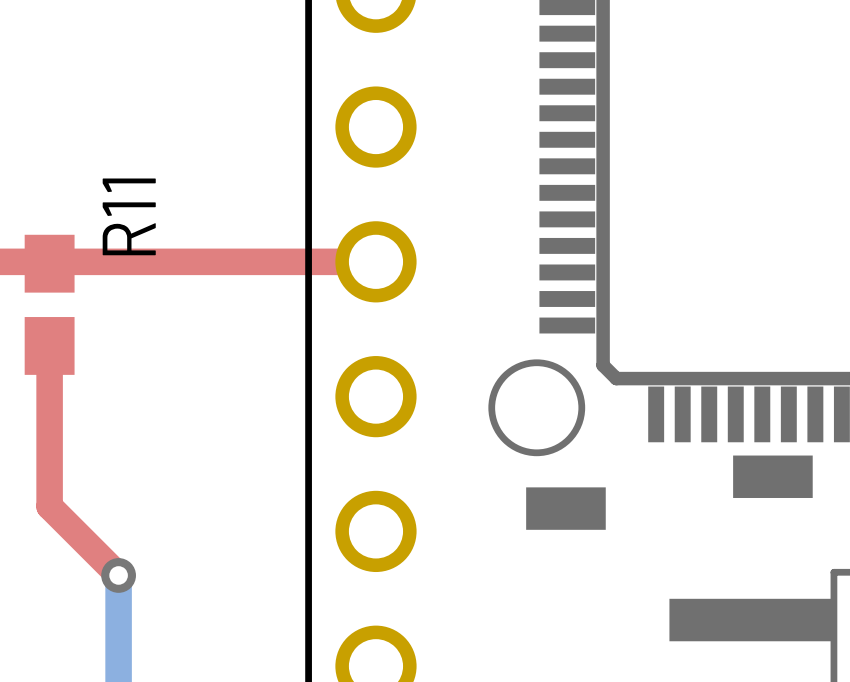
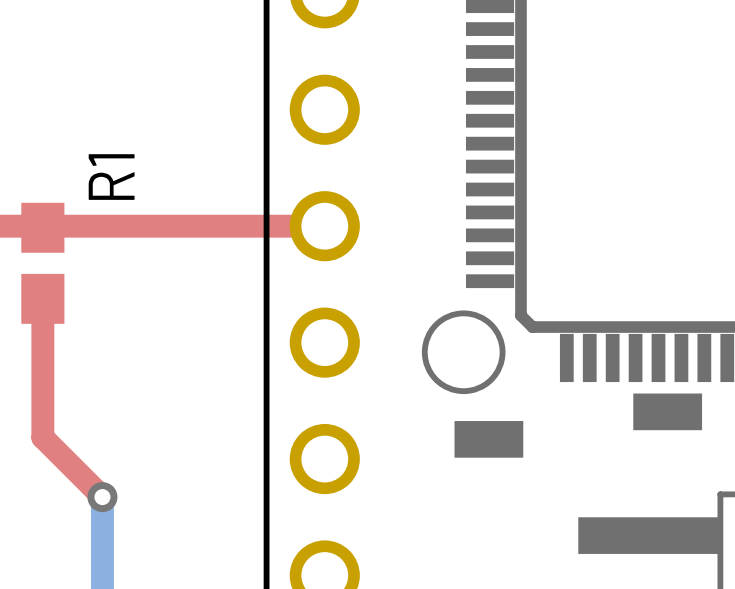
R11 name: R11 (129, 216) -> R1 (111, 177)

